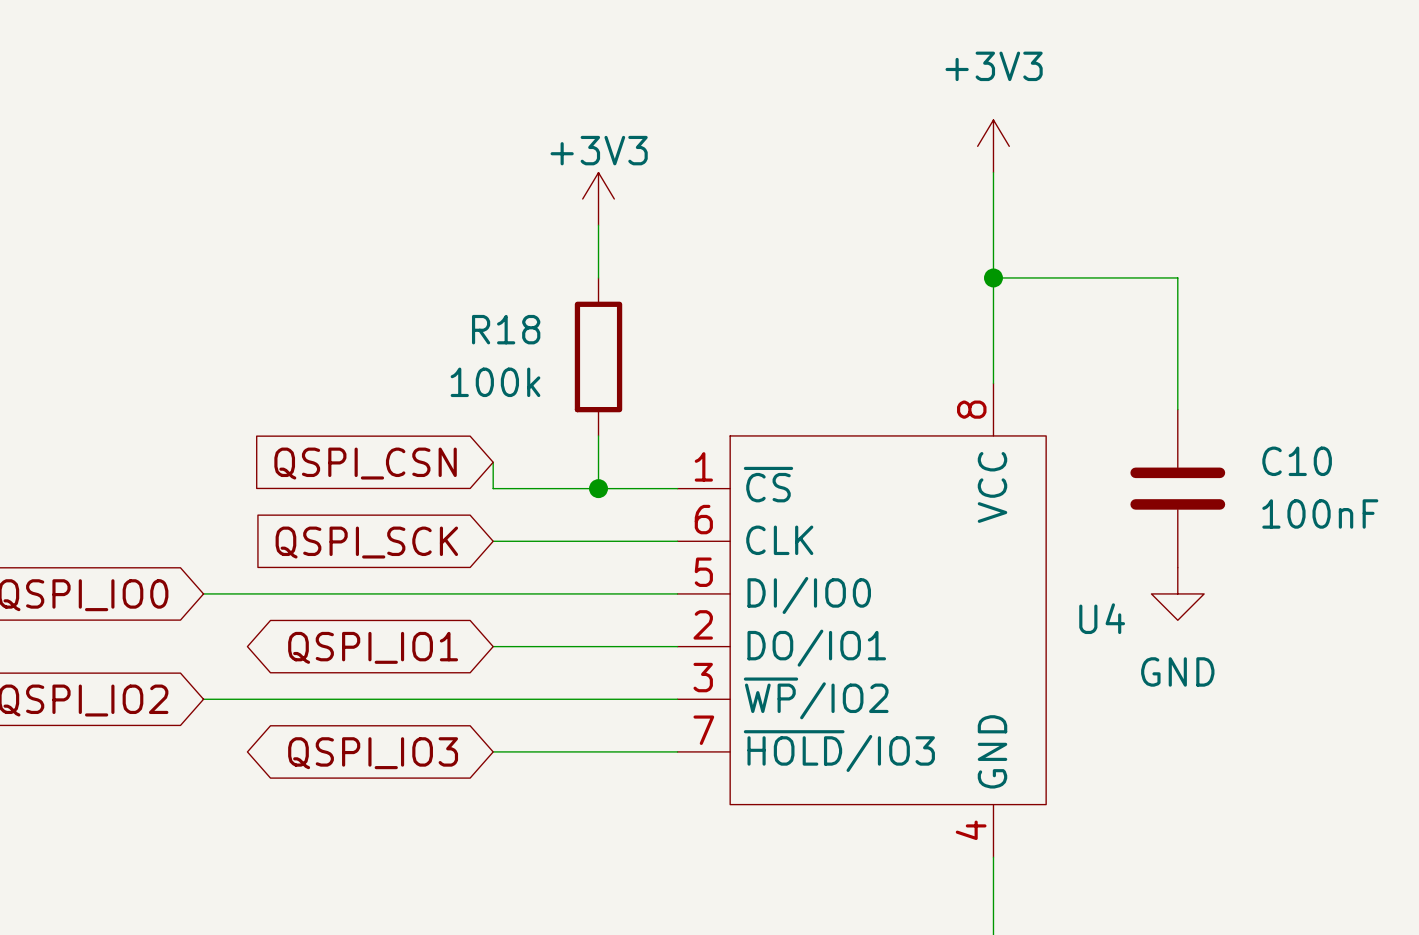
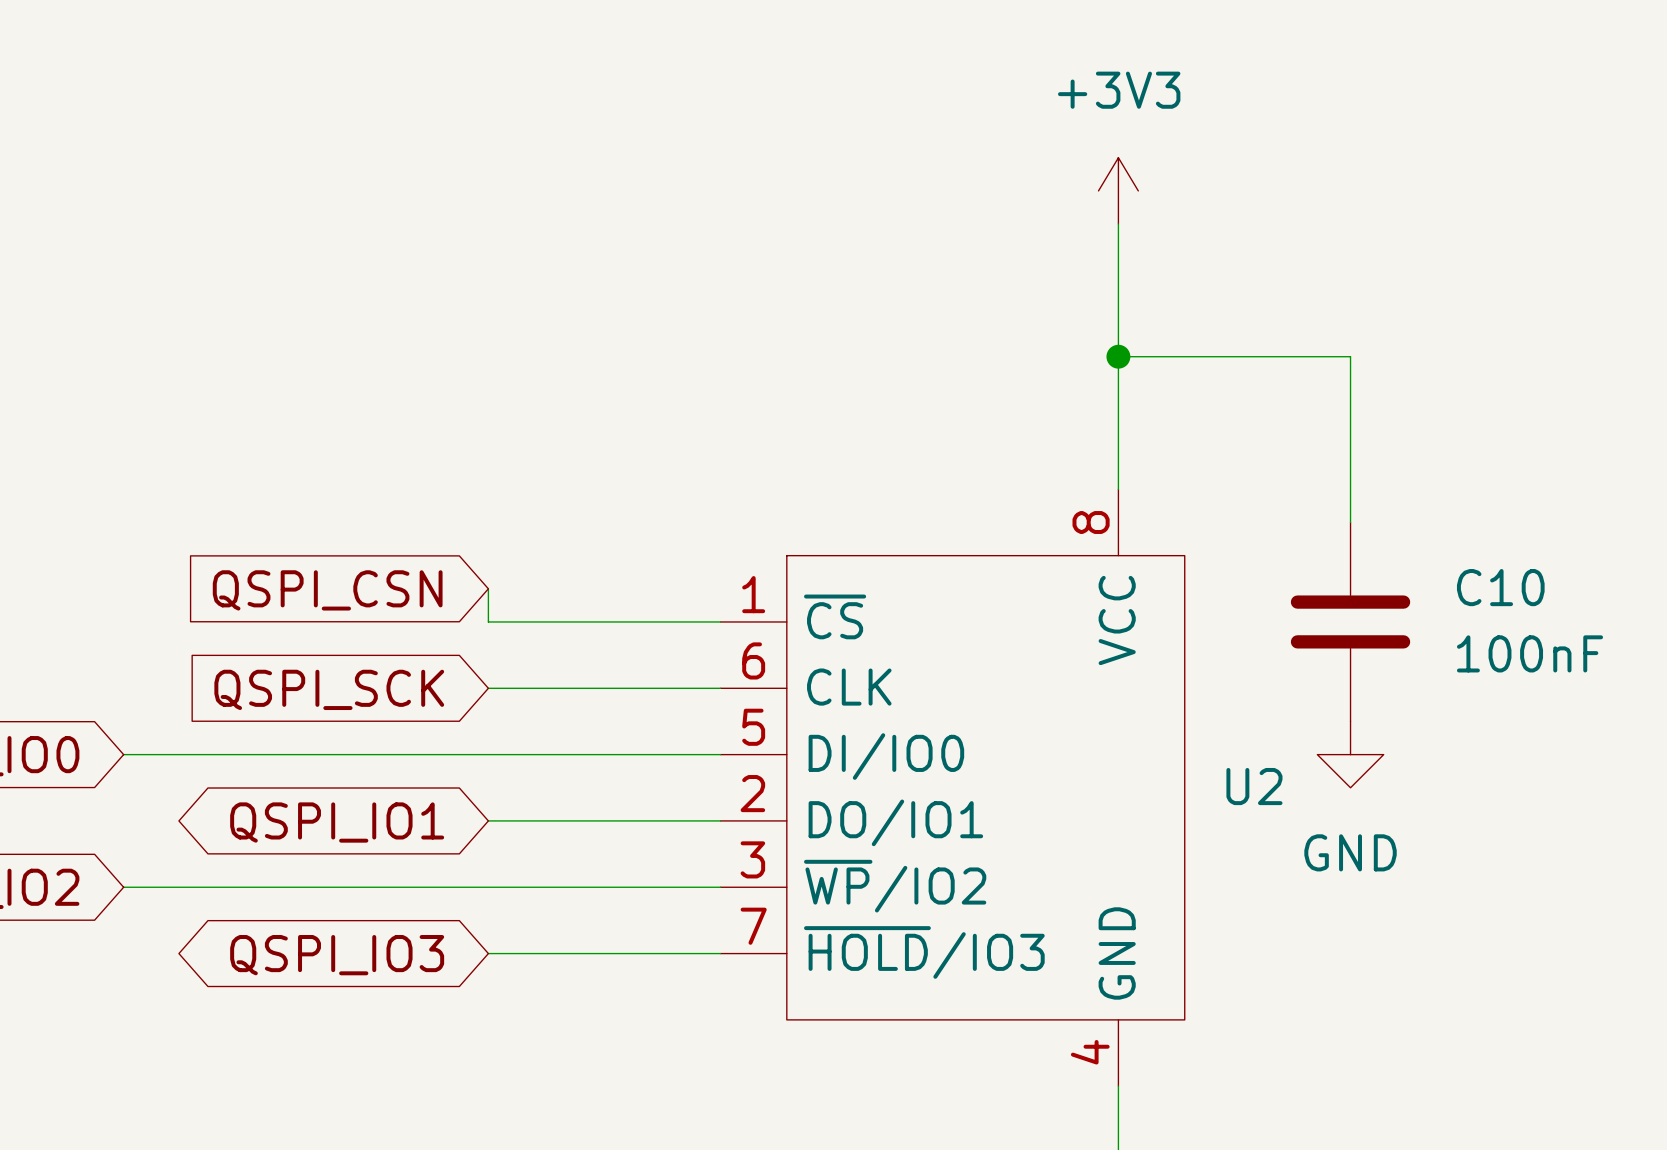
power symbol: +3V3 (598, 198) -> none
wire: (598, 225) (598, 277) -> none
R18: 100k (598, 356) -> none
wire: (598, 435) (598, 488) -> none
junction: (598, 488) -> none
U4 name: U4 (1102, 618) -> U2 (1254, 786)

